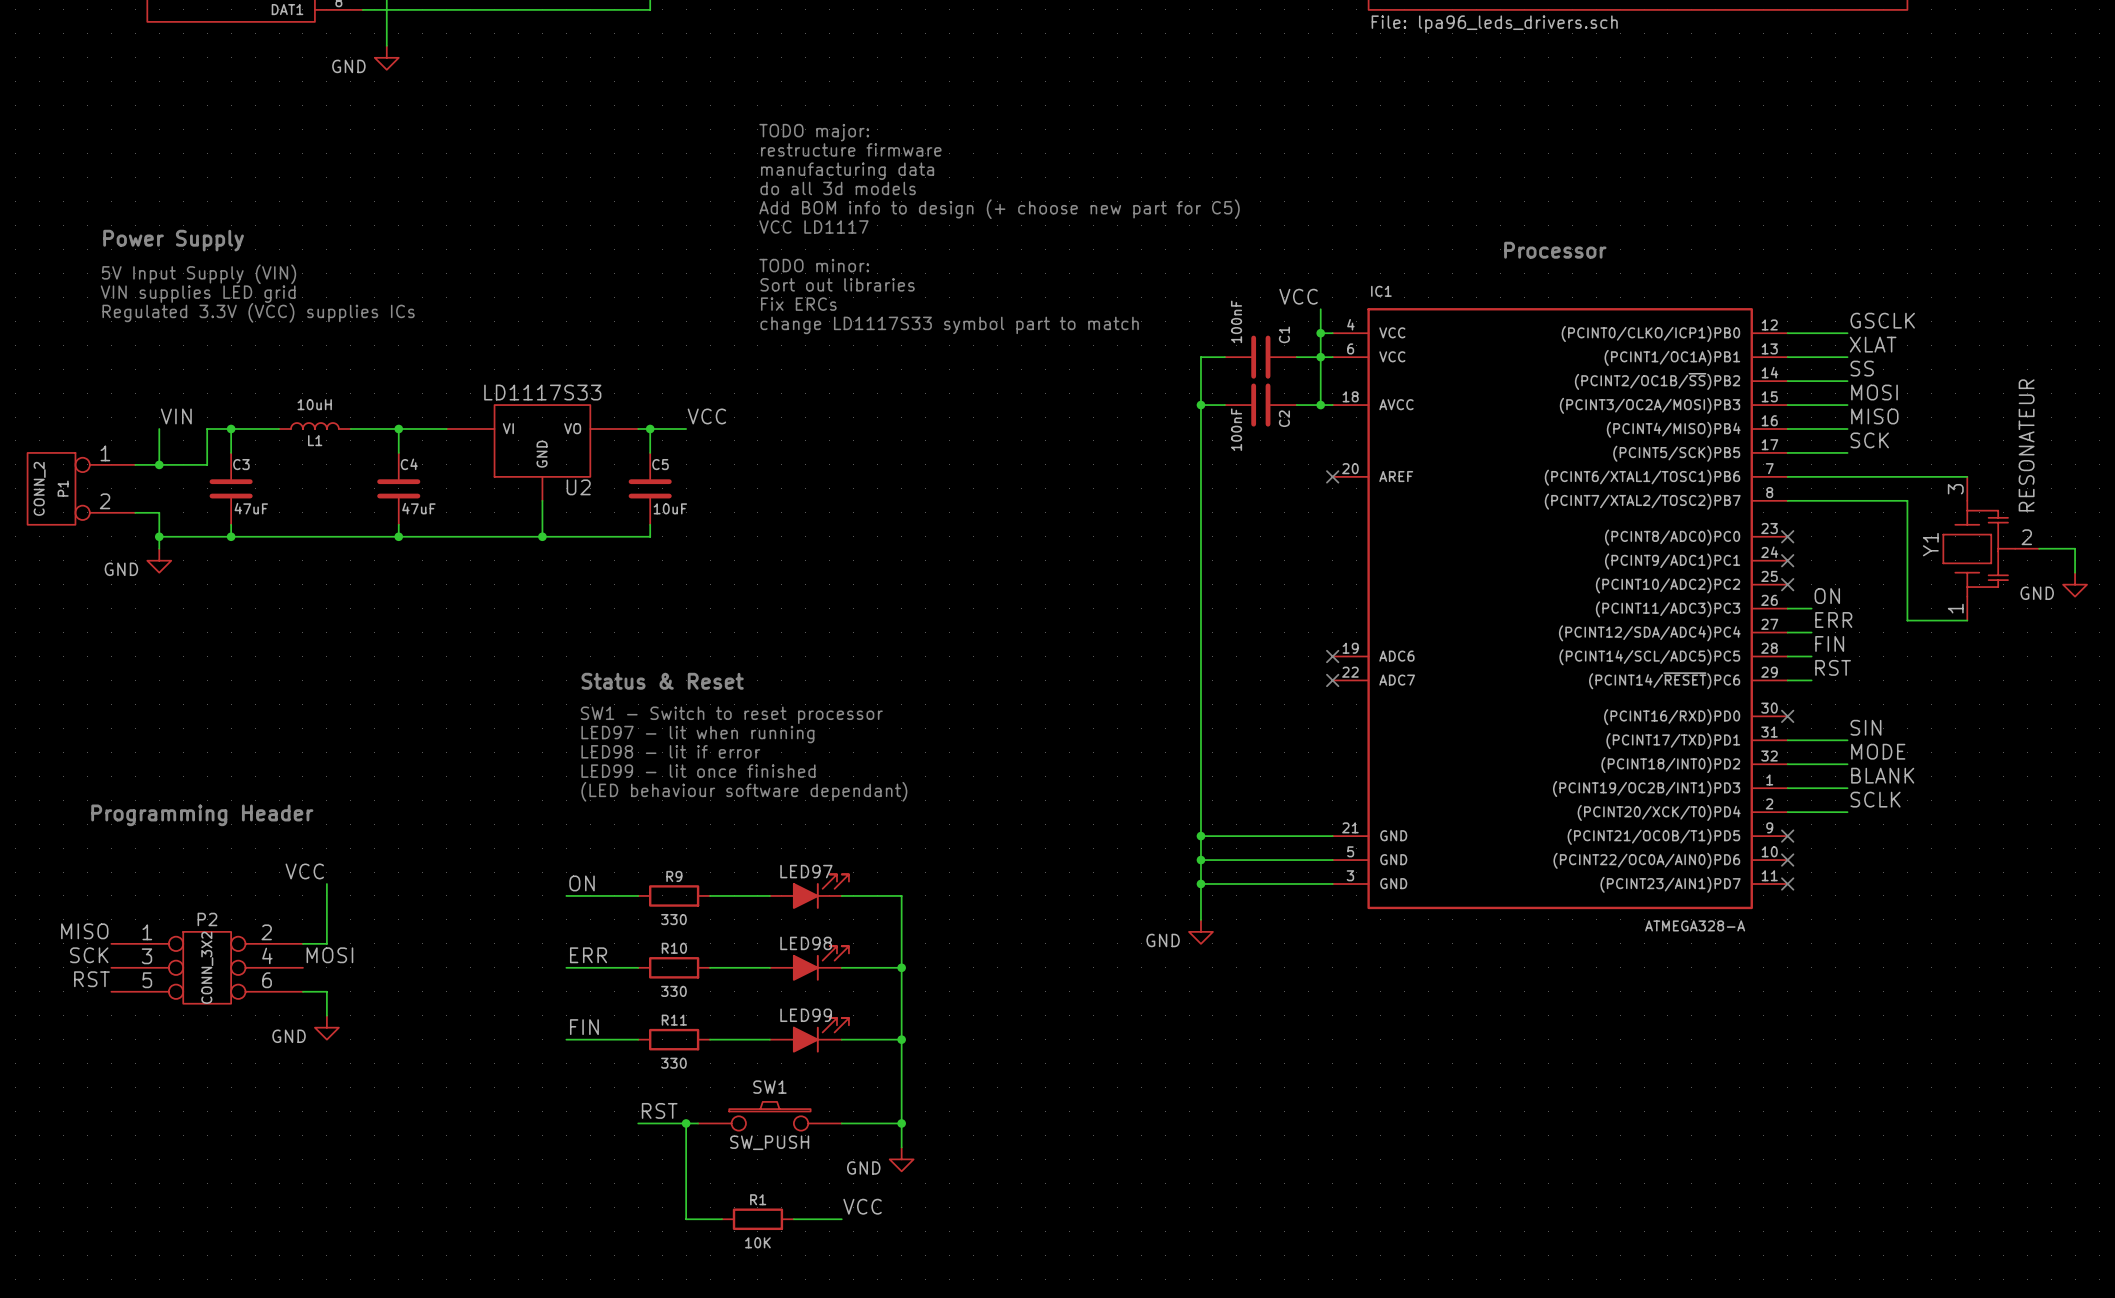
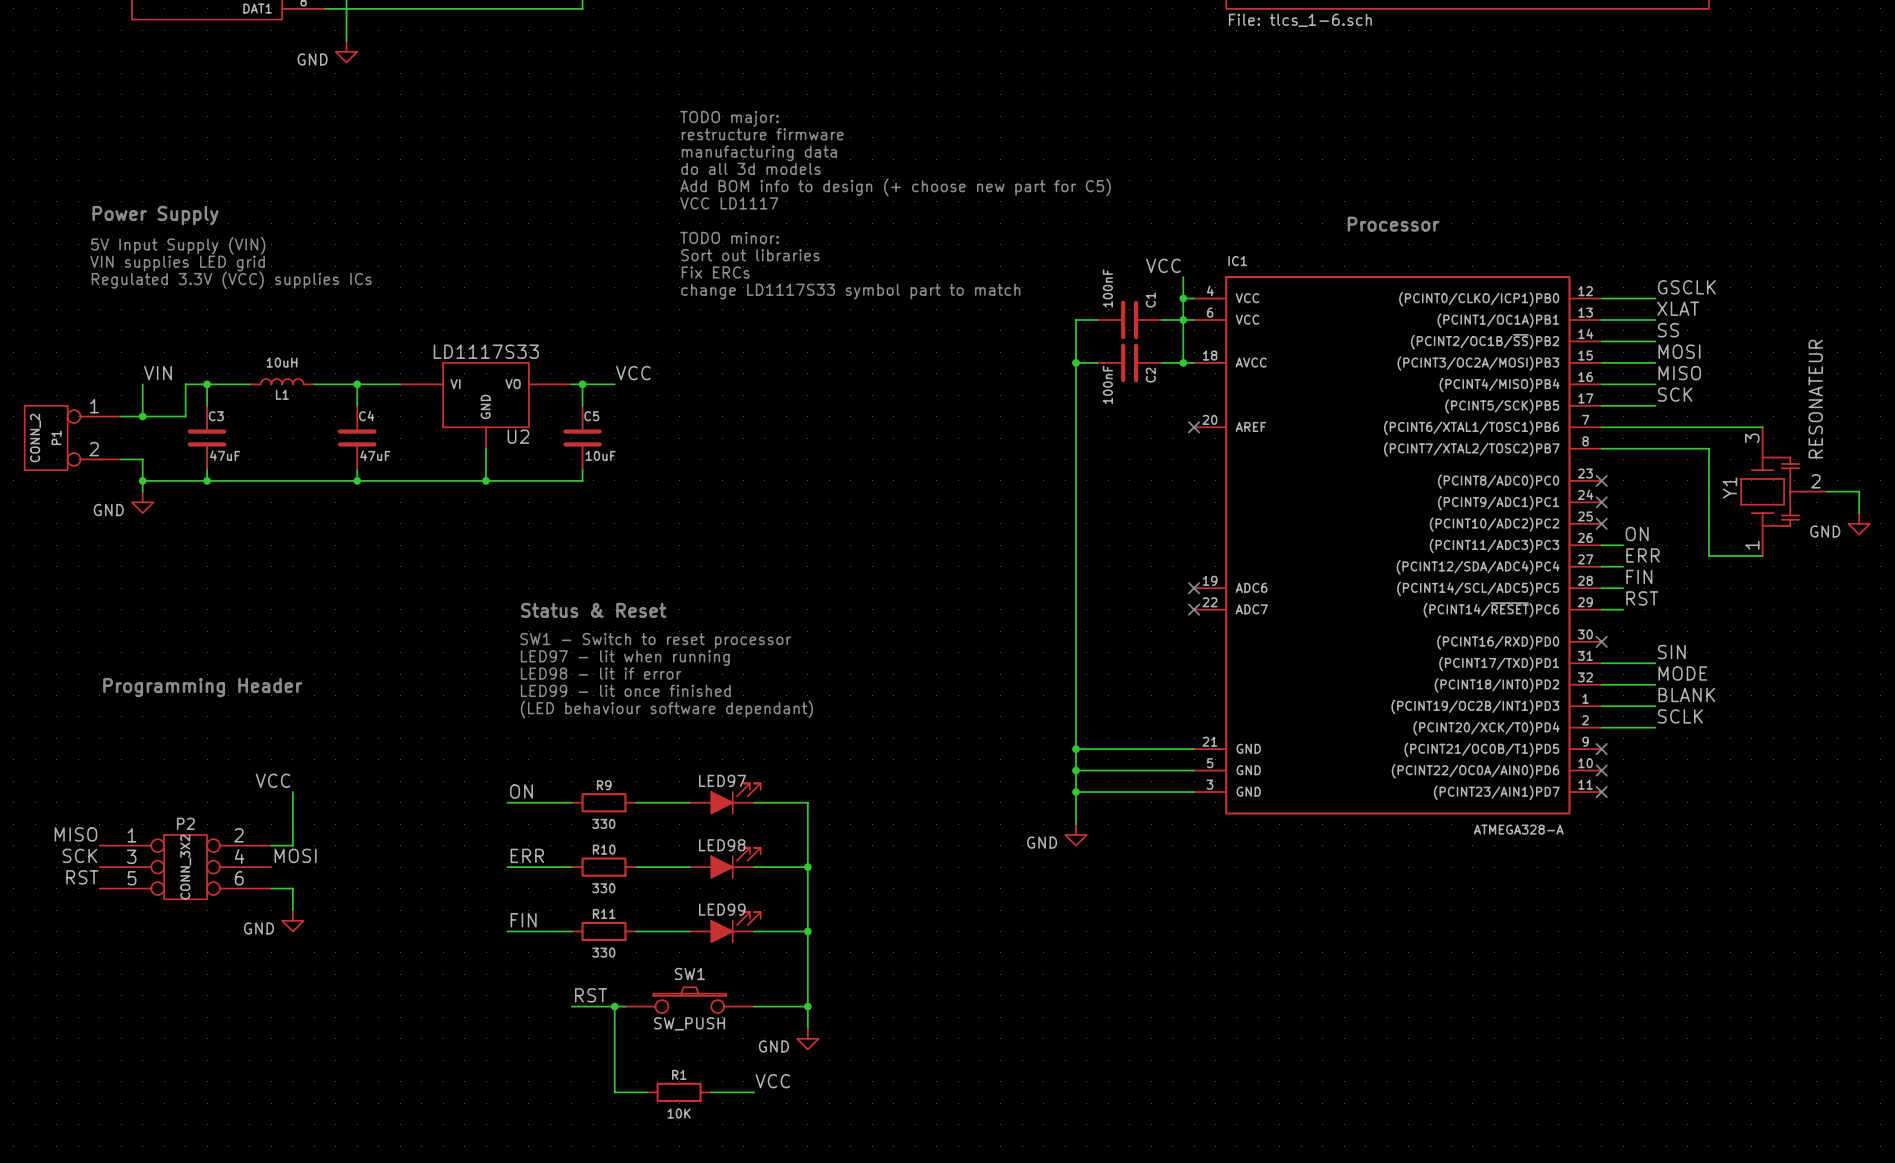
sheet value: File: lpa96_leds_drivers.sch (1494, 24) -> File: tlcs_1-6.sch (1300, 20)
text position: Programming Header (202, 815) -> Programming Header (202, 687)

